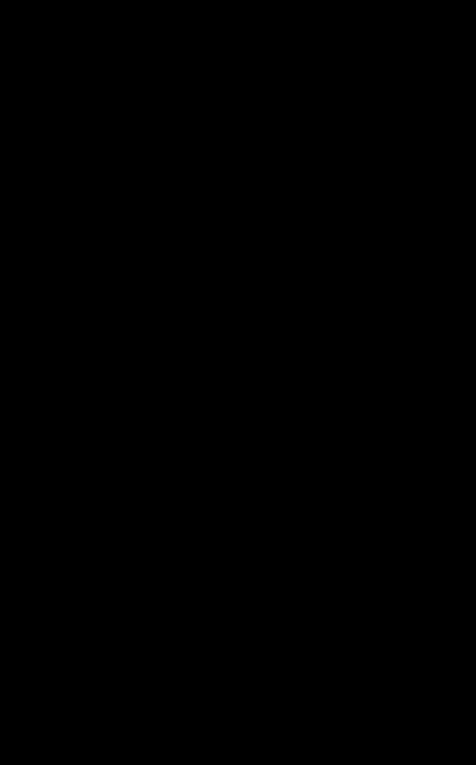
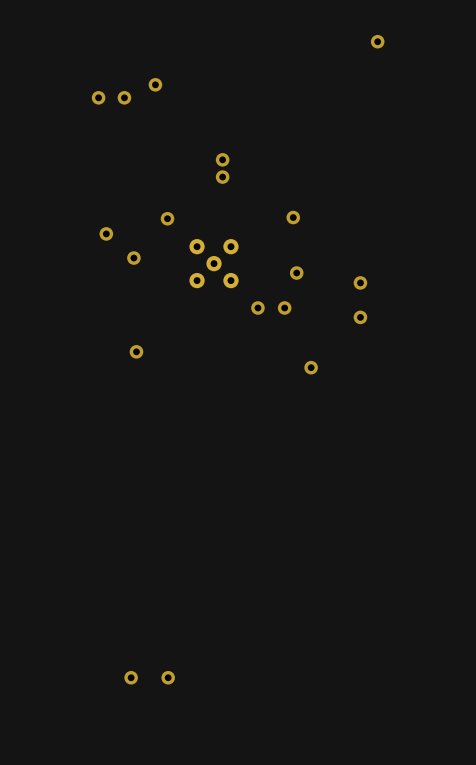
via: none -> (377, 41)
via: none -> (155, 84)
via: none -> (98, 97)
via: none -> (124, 97)
via: none -> (222, 159)
via: none -> (222, 177)
via: none -> (293, 217)
via: none -> (167, 218)
via: none -> (106, 233)
via: none -> (133, 258)
part: none -> (214, 263)
via: none -> (296, 273)
via: none -> (360, 282)
via: none -> (257, 307)
via: none -> (284, 307)
via: none -> (360, 317)
via: none -> (136, 351)
via: none -> (311, 367)
via: none -> (131, 677)
via: none -> (168, 677)

